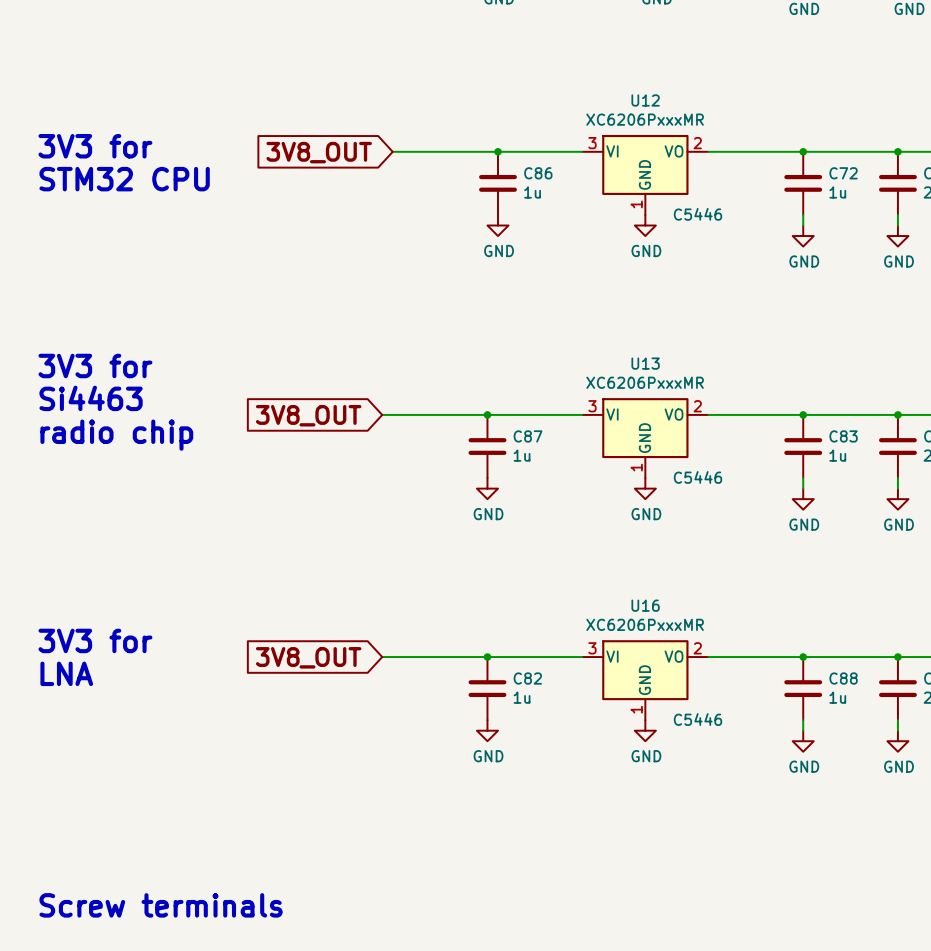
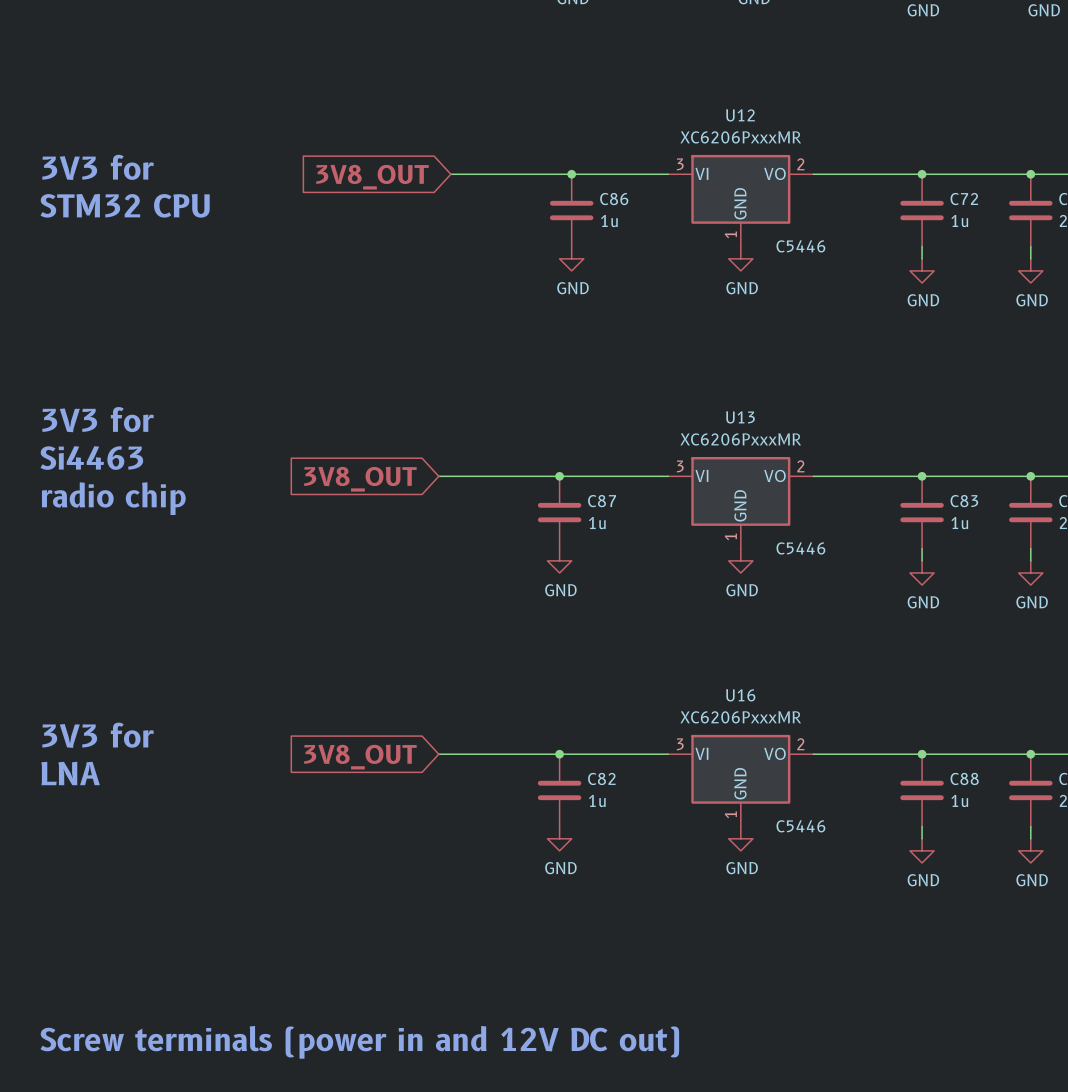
text: Screw terminals (161, 905) -> Screw terminals (power in and 12V DC out) (359, 1042)

